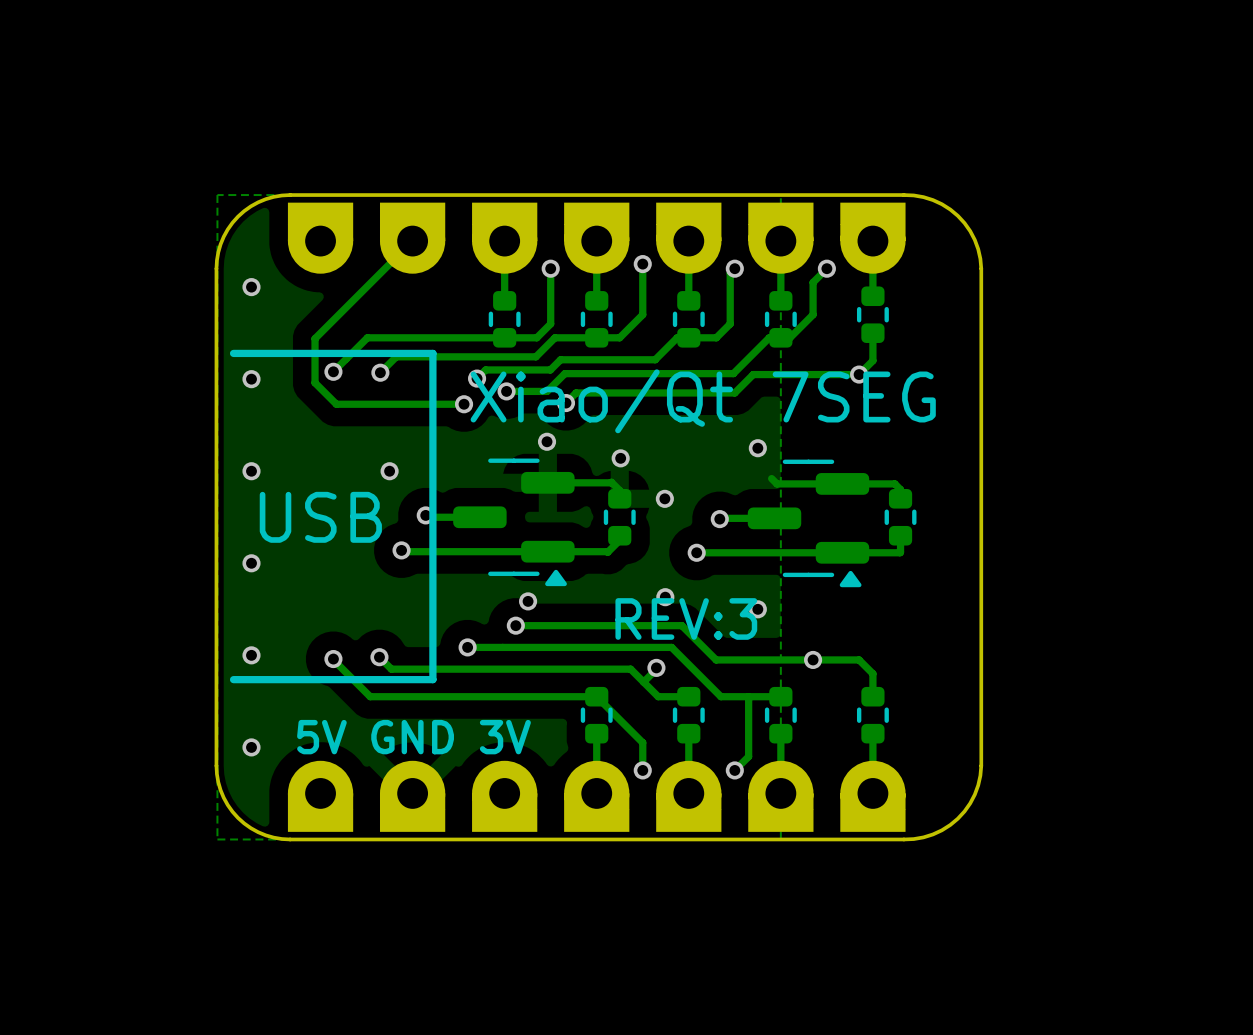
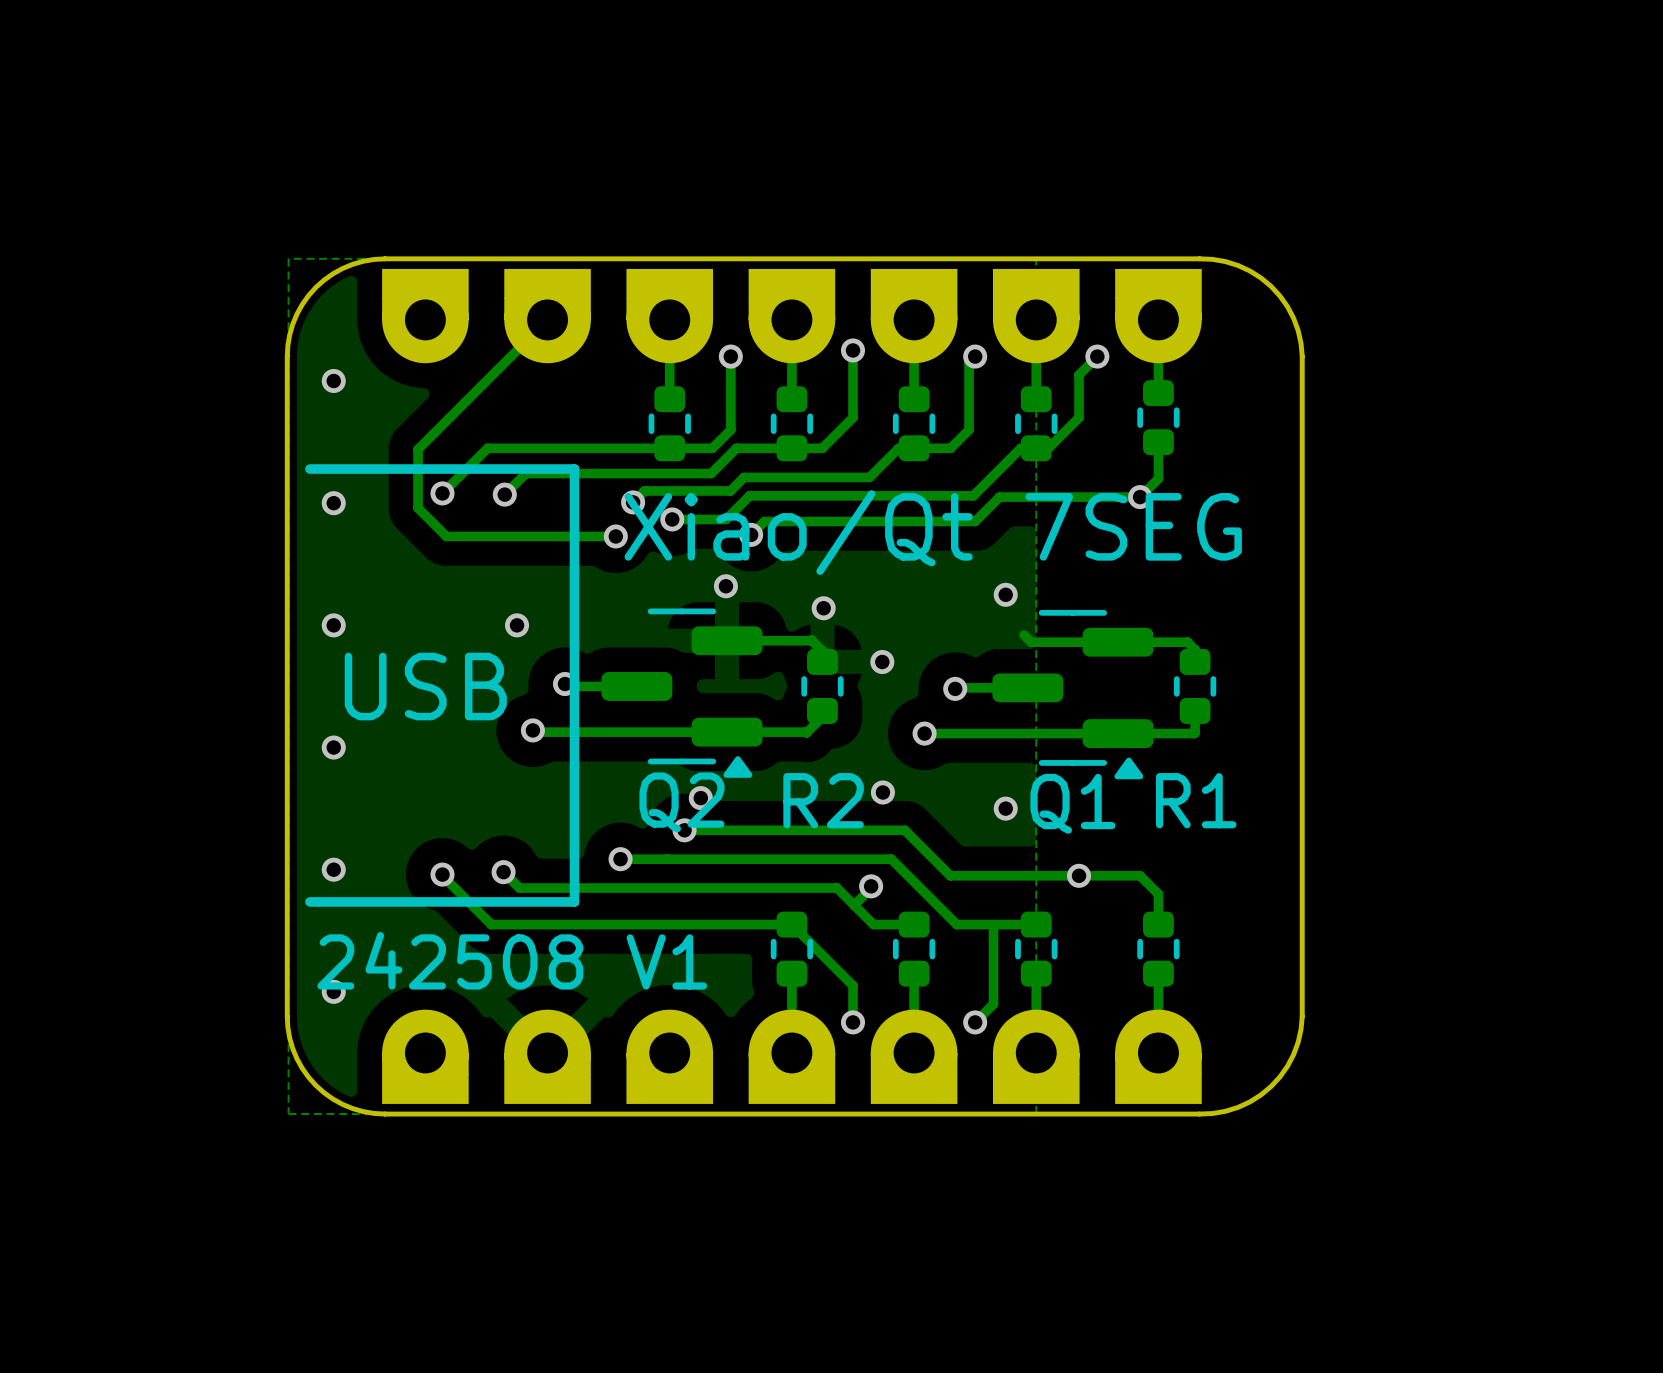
R2 name: none -> R2 (823, 800)
R1 name: none -> R1 (1196, 800)
Q2 name: none -> Q2 (681, 802)
Q1 name: none -> Q1 (1072, 803)
text: REV:3 (686, 618) -> none
text: none -> 242508 V1 (512, 960)
text: 5V (321, 737) -> none
text: GND (412, 737) -> none
text: 3V (505, 737) -> none

